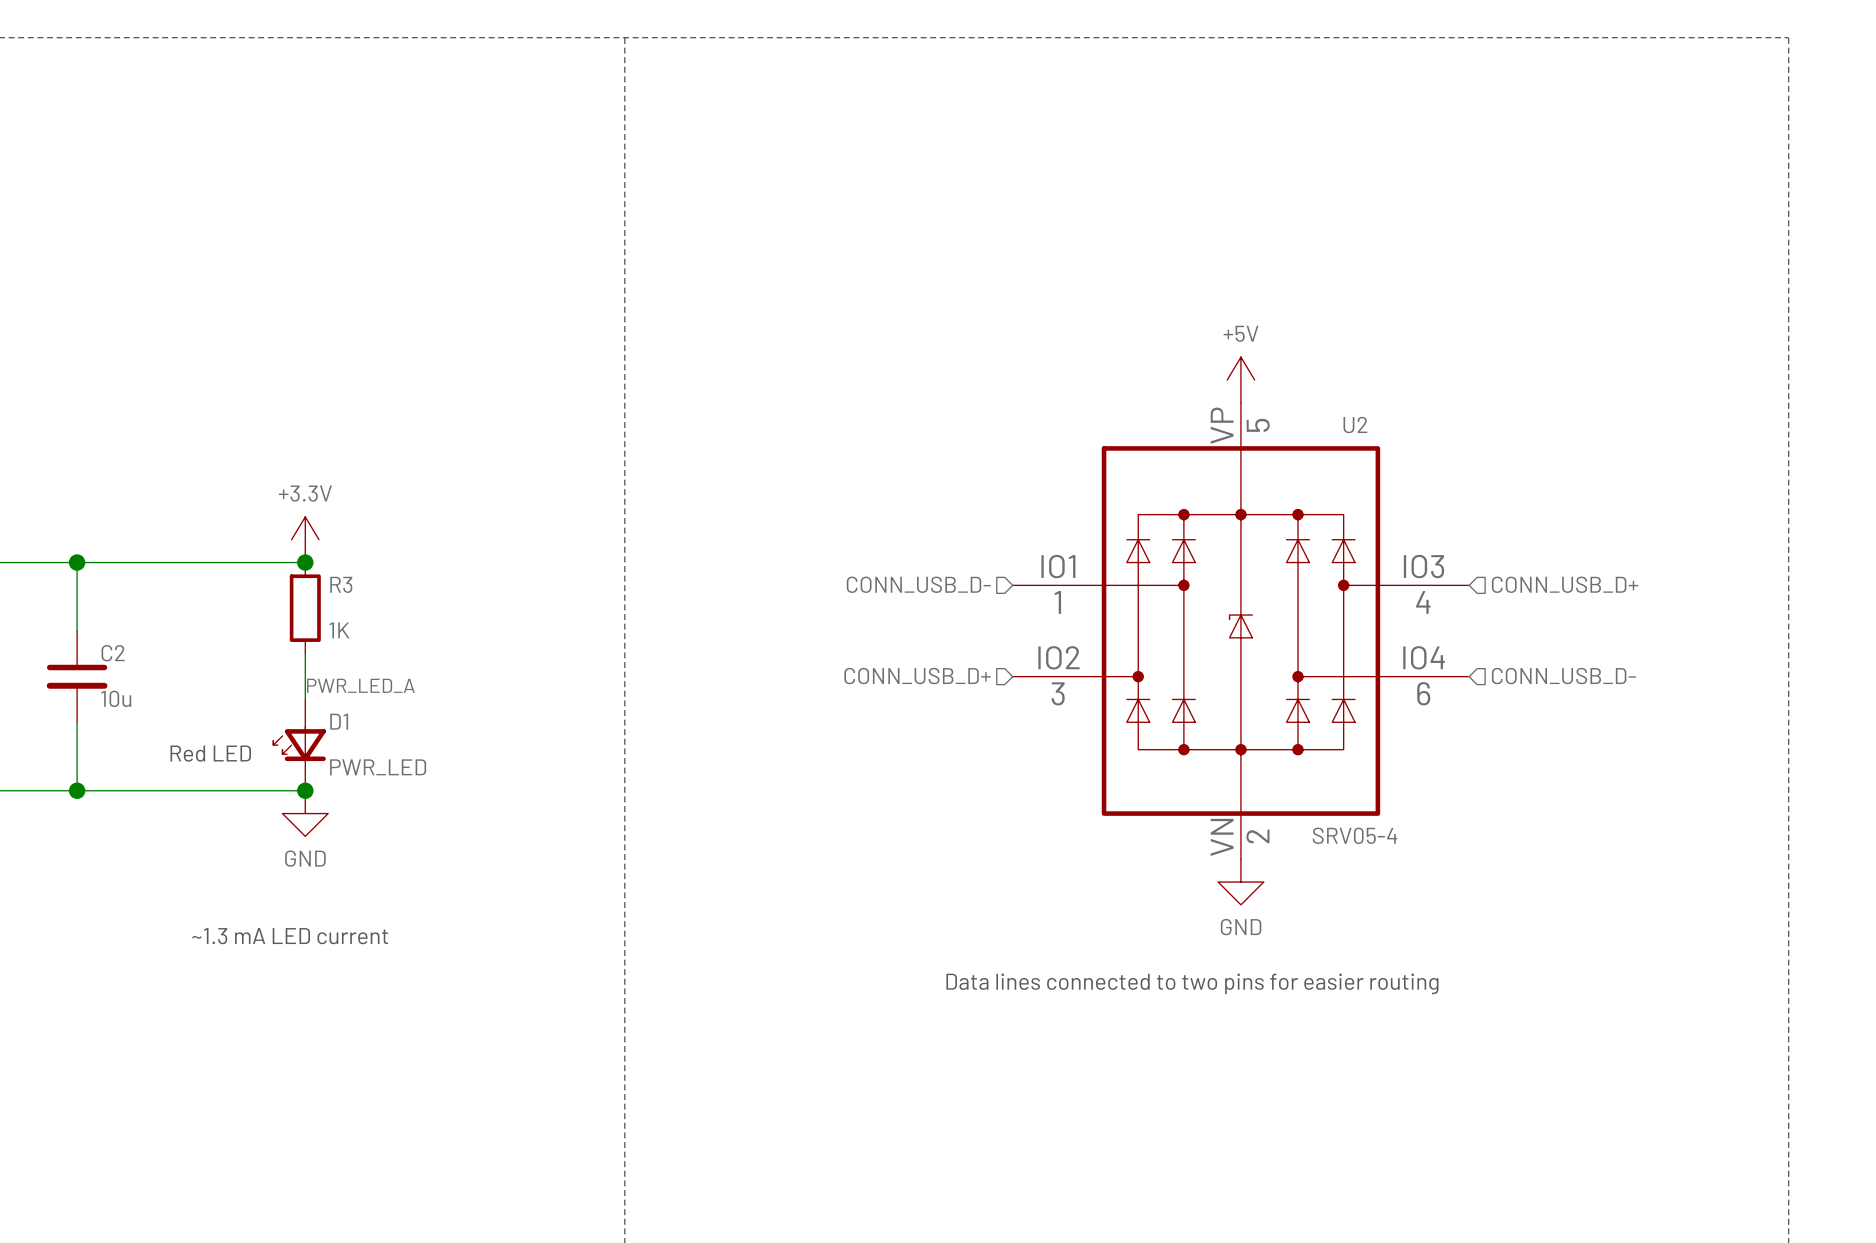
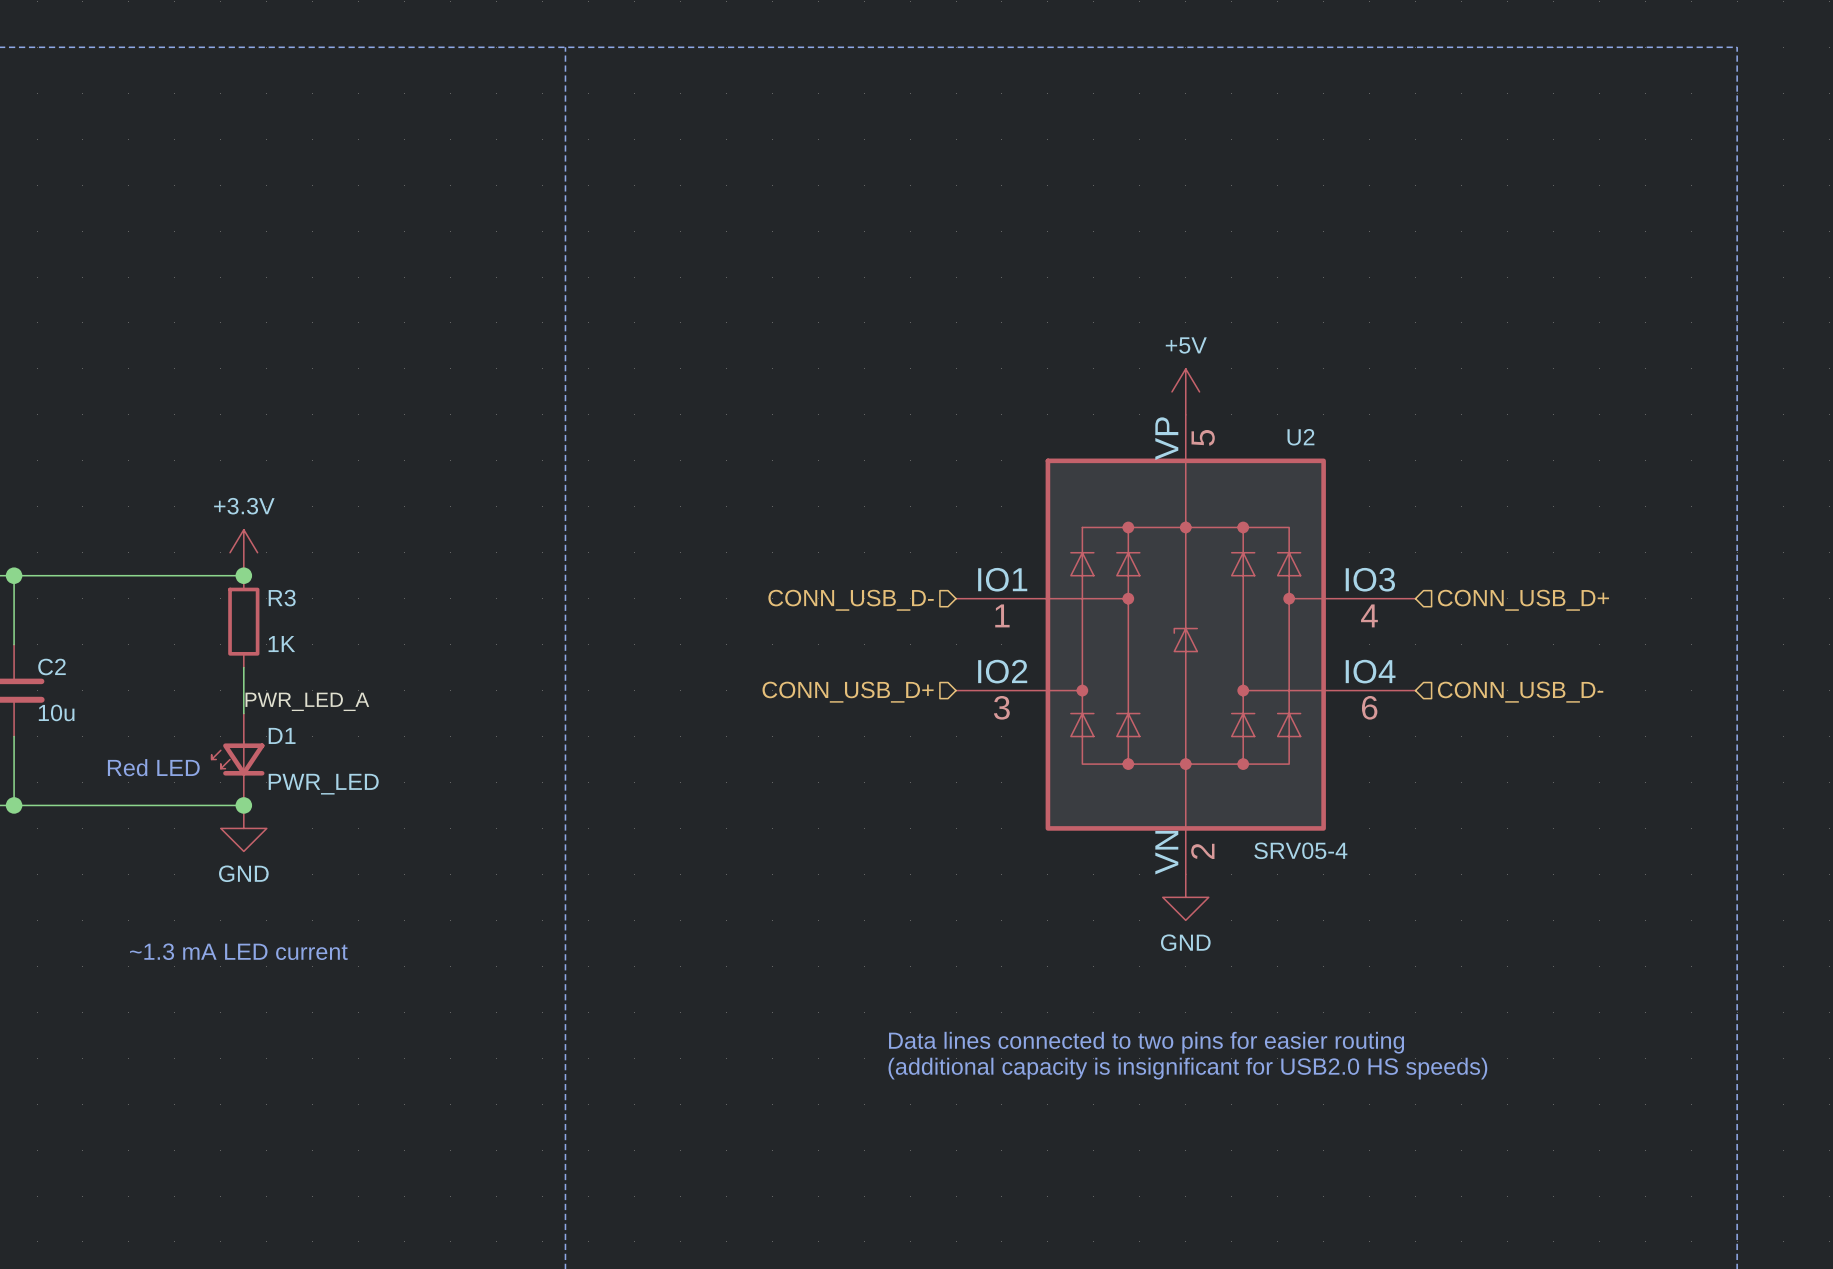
text position: Data lines connected to two pins for easier routing (1192, 983) -> Data lines connected to two pins for easier routing (1146, 1042)
text: none -> (additional capacity is insignificant for USB2.0 HS speeds) (1187, 1068)

